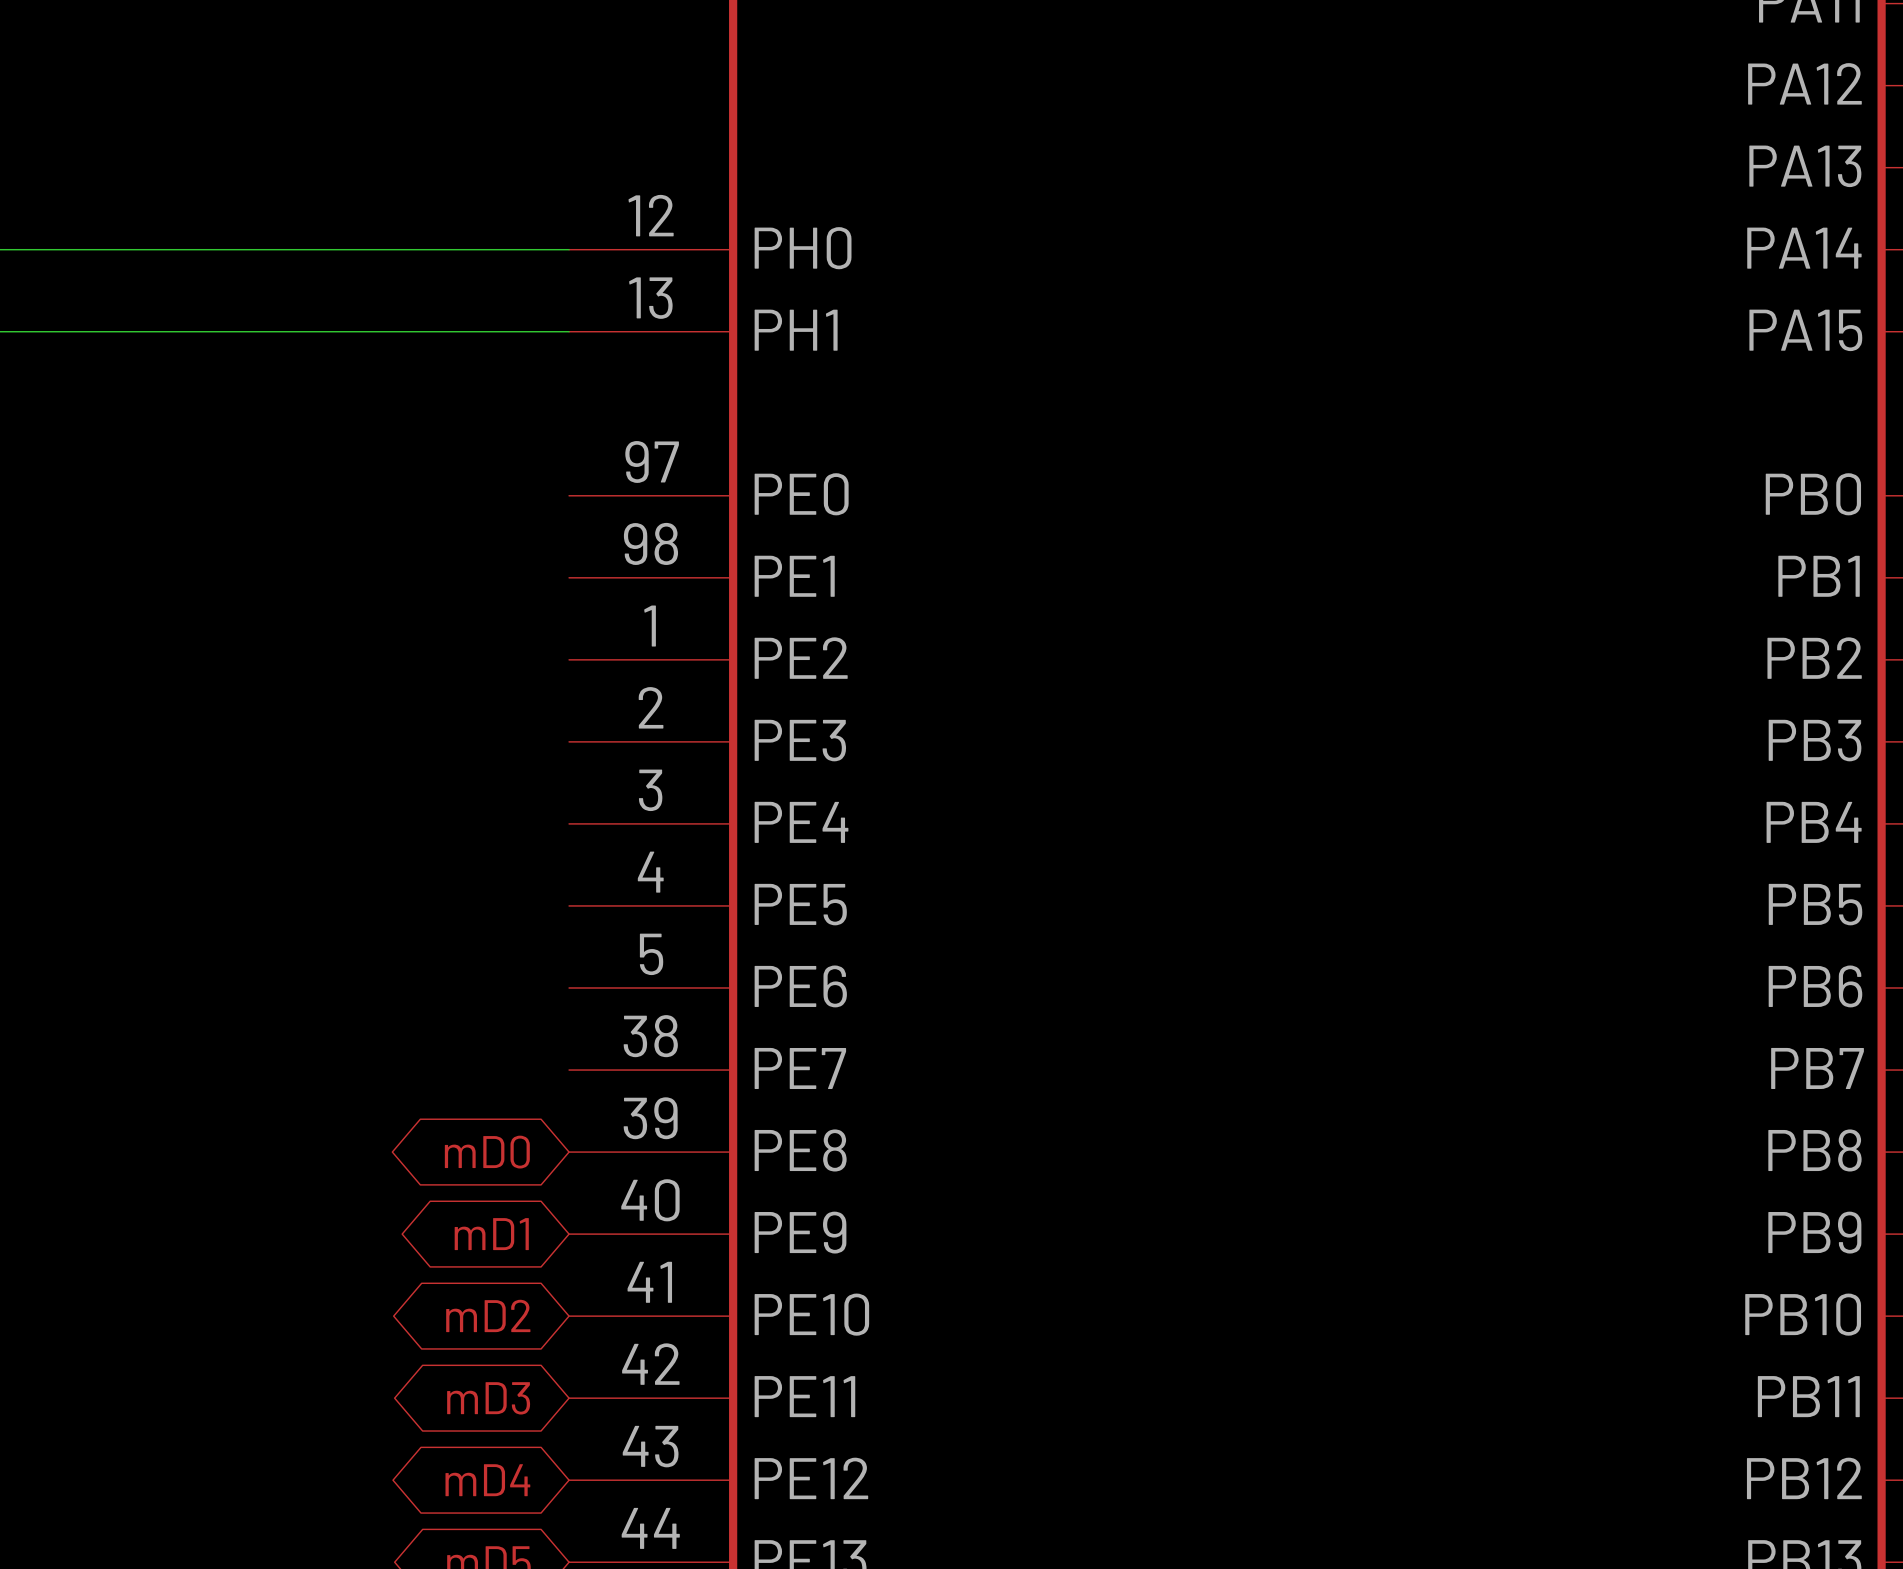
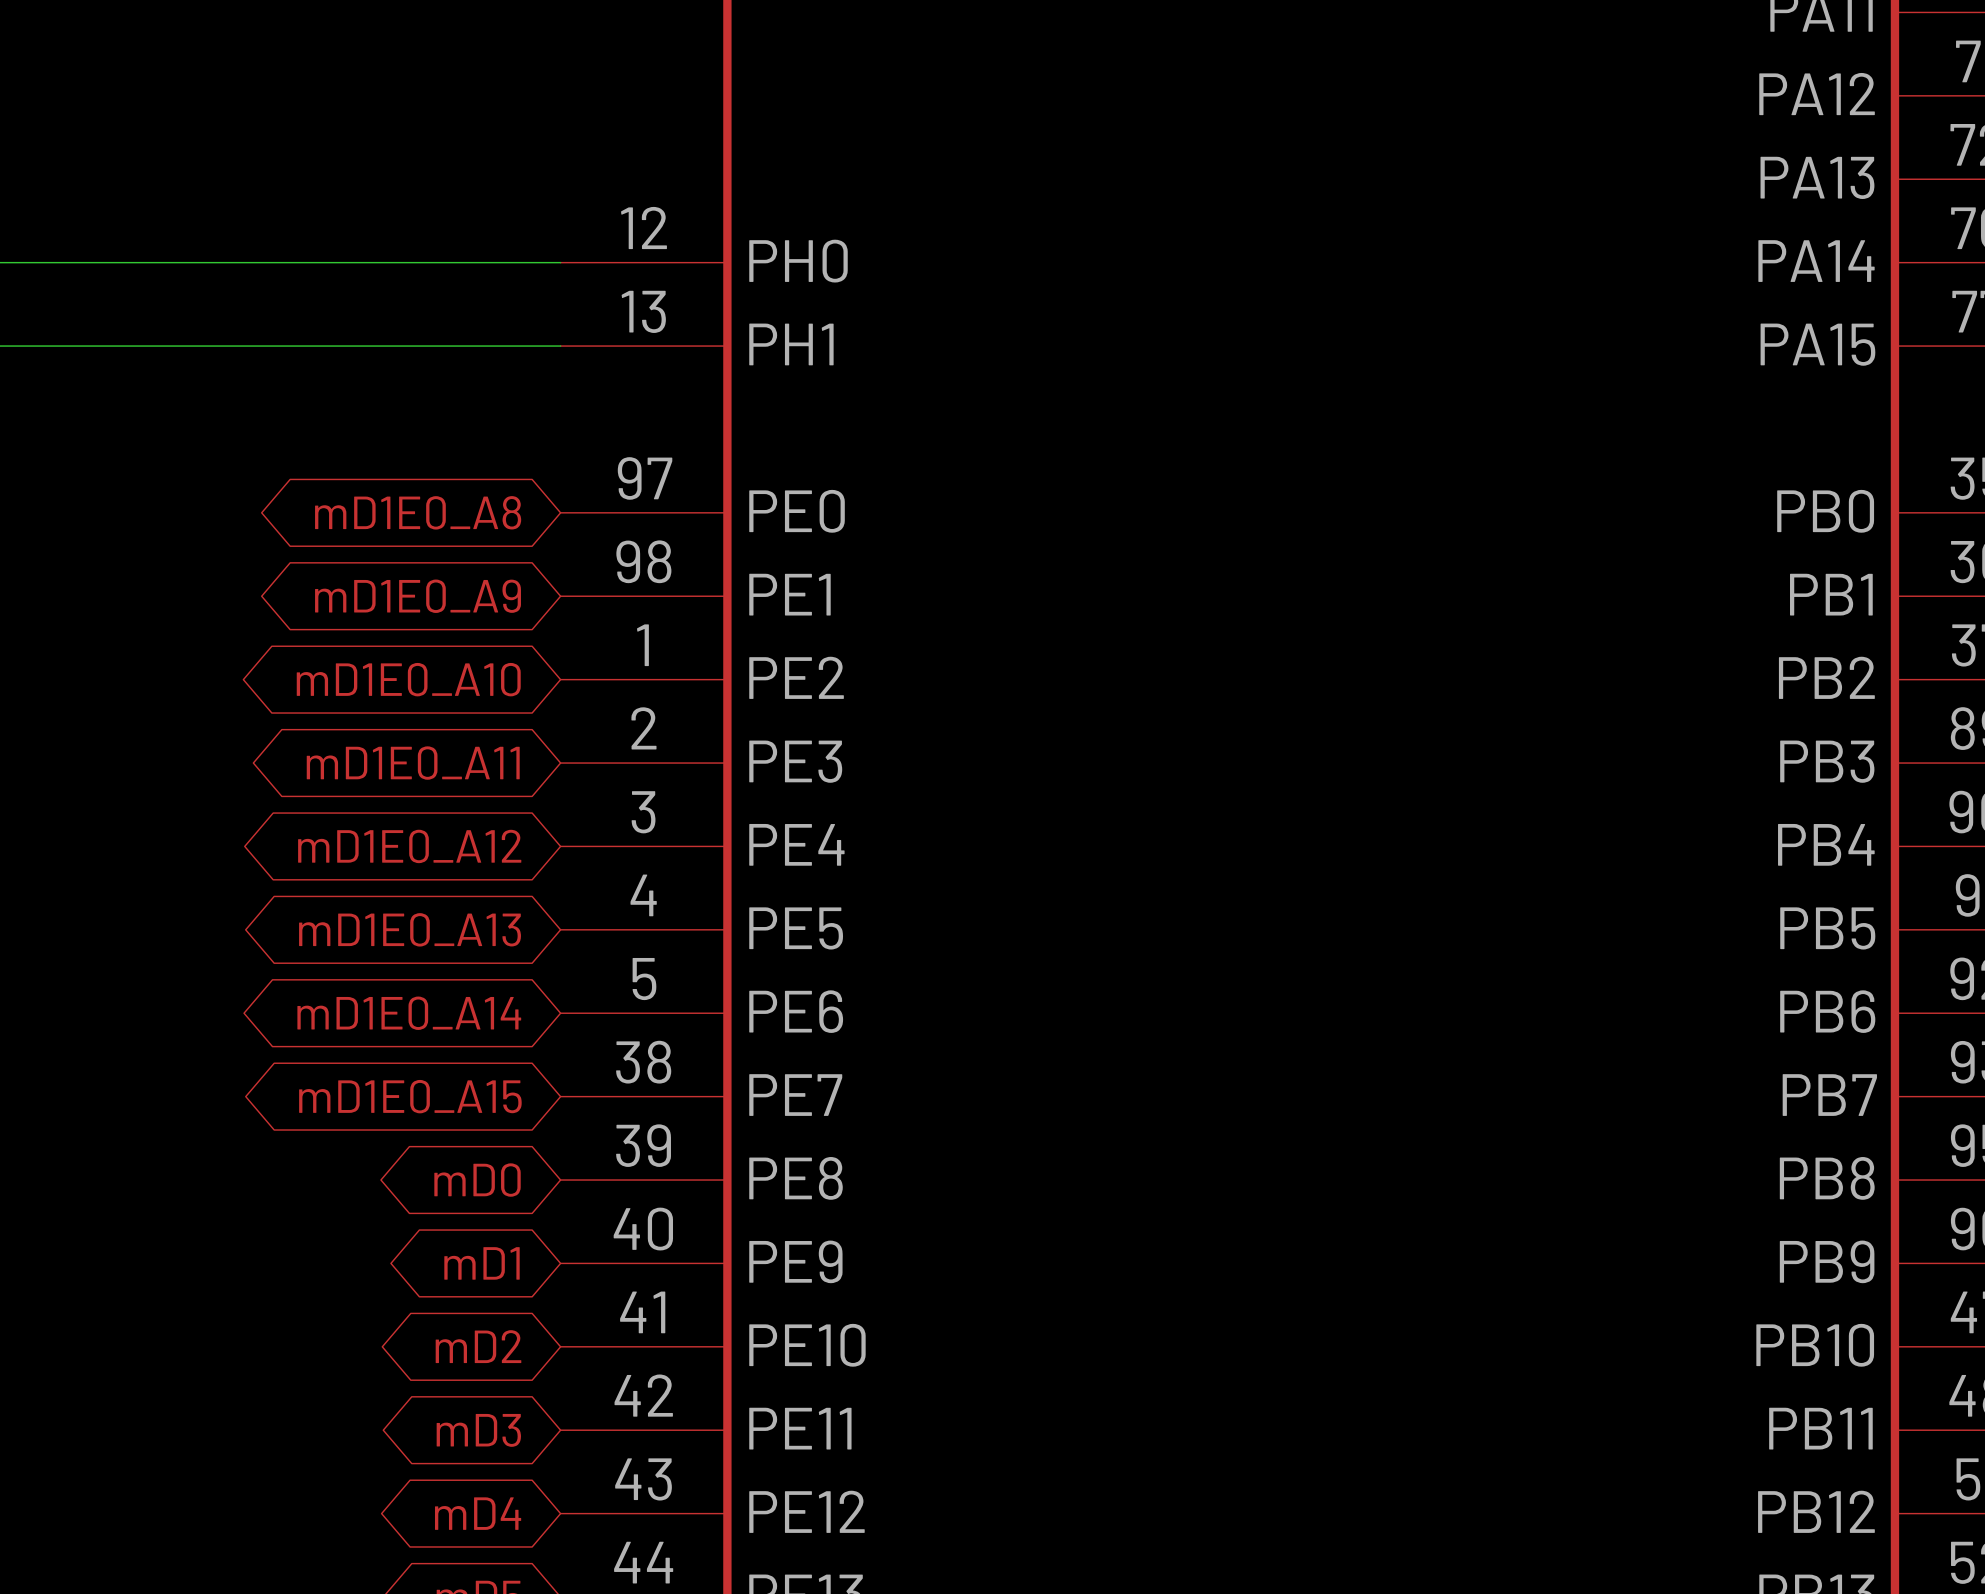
global label: none -> mD1E0_A8 (418, 512)
global label: none -> mD1E0_A9 (418, 596)
global label: none -> mD1E0_A10 (408, 679)
global label: none -> mD1E0_A11 (413, 763)
global label: none -> mD1E0_A12 (409, 846)
global label: none -> mD1E0_A13 (410, 929)
global label: none -> mD1E0_A14 (409, 1013)
global label: none -> mD1E0_A15 (410, 1096)

